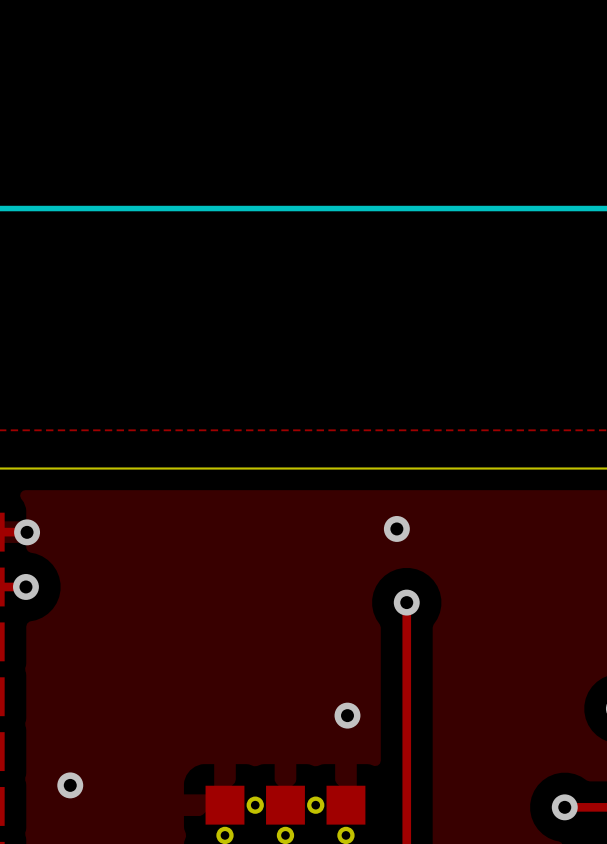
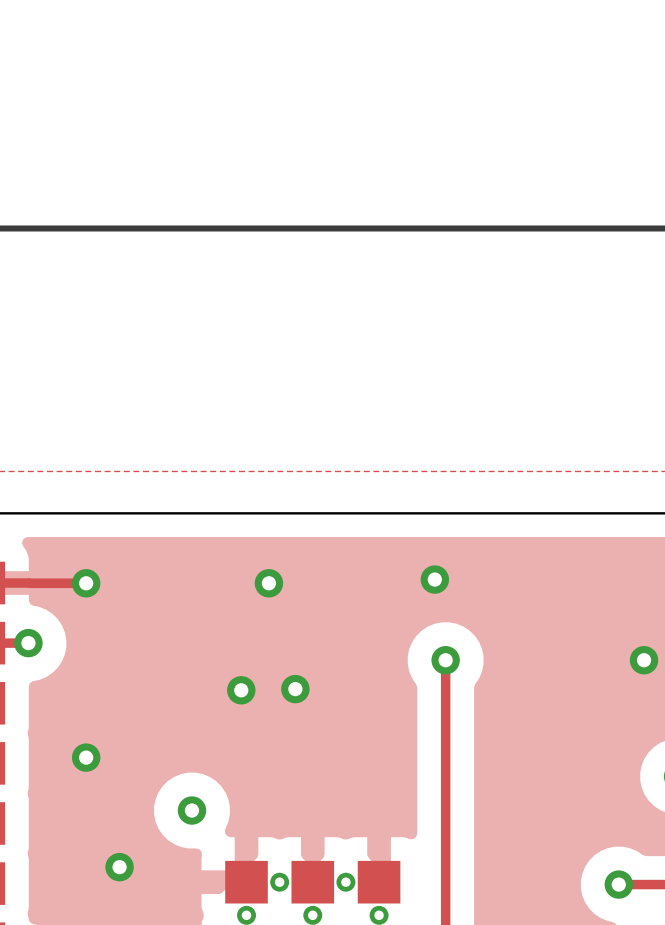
track: none -> (29, 583) (86, 583)
via position: (27, 532) -> (86, 583)
via: none -> (268, 583)
via: none -> (644, 660)
via: none -> (295, 689)
via: none -> (241, 690)
via: none -> (86, 757)
via: (347, 715) -> none
via: none -> (191, 810)
via: (70, 785) -> none
via: none -> (119, 867)

